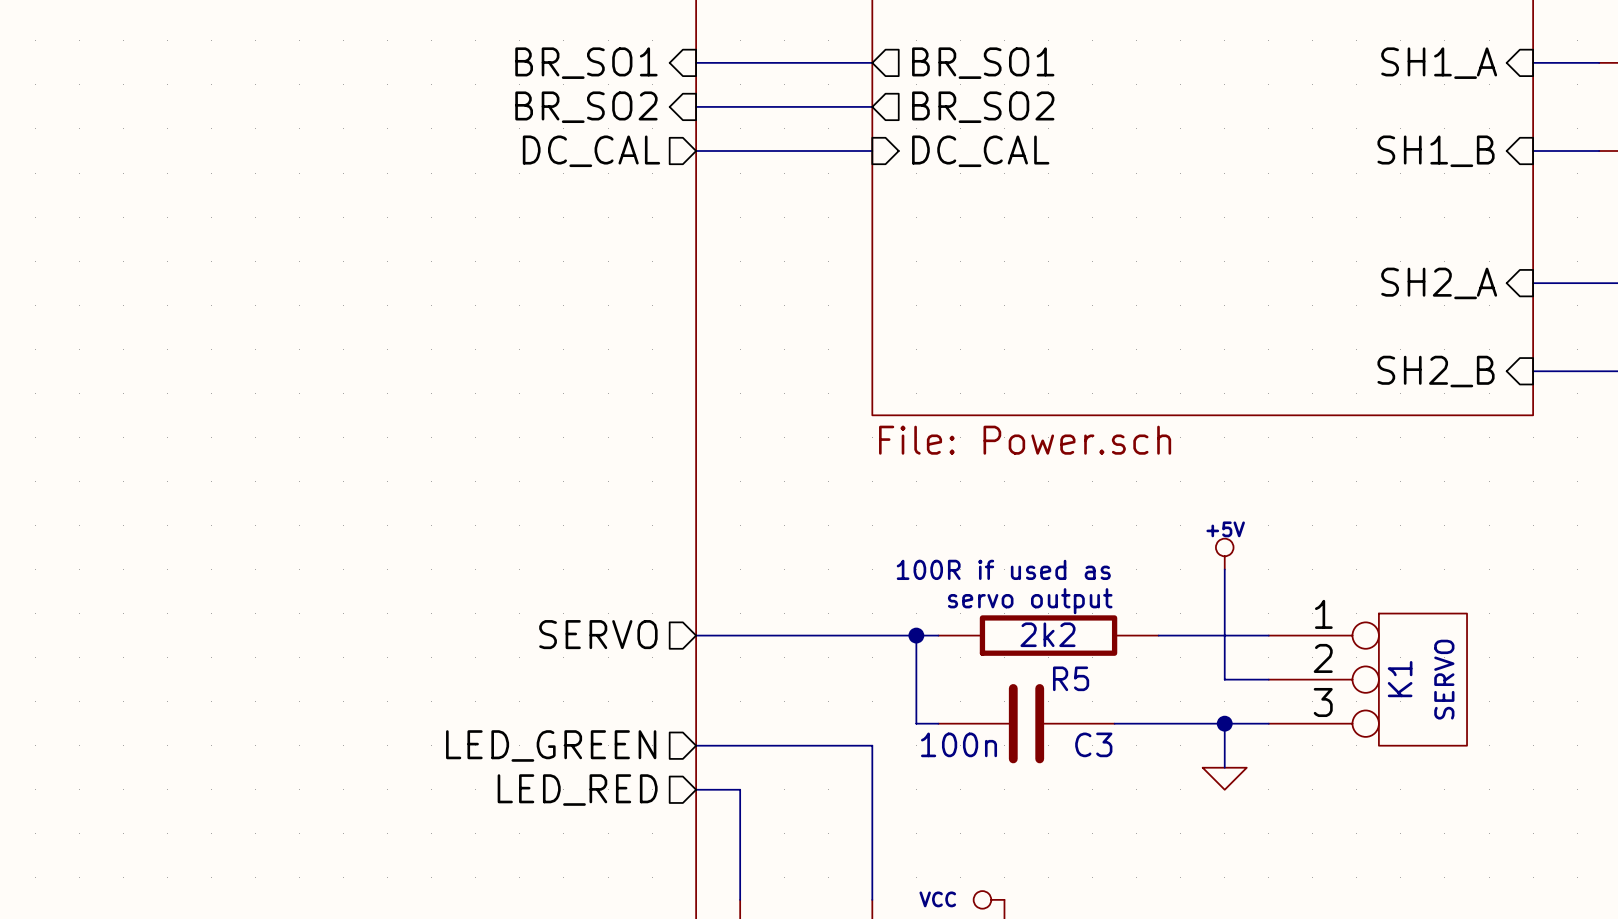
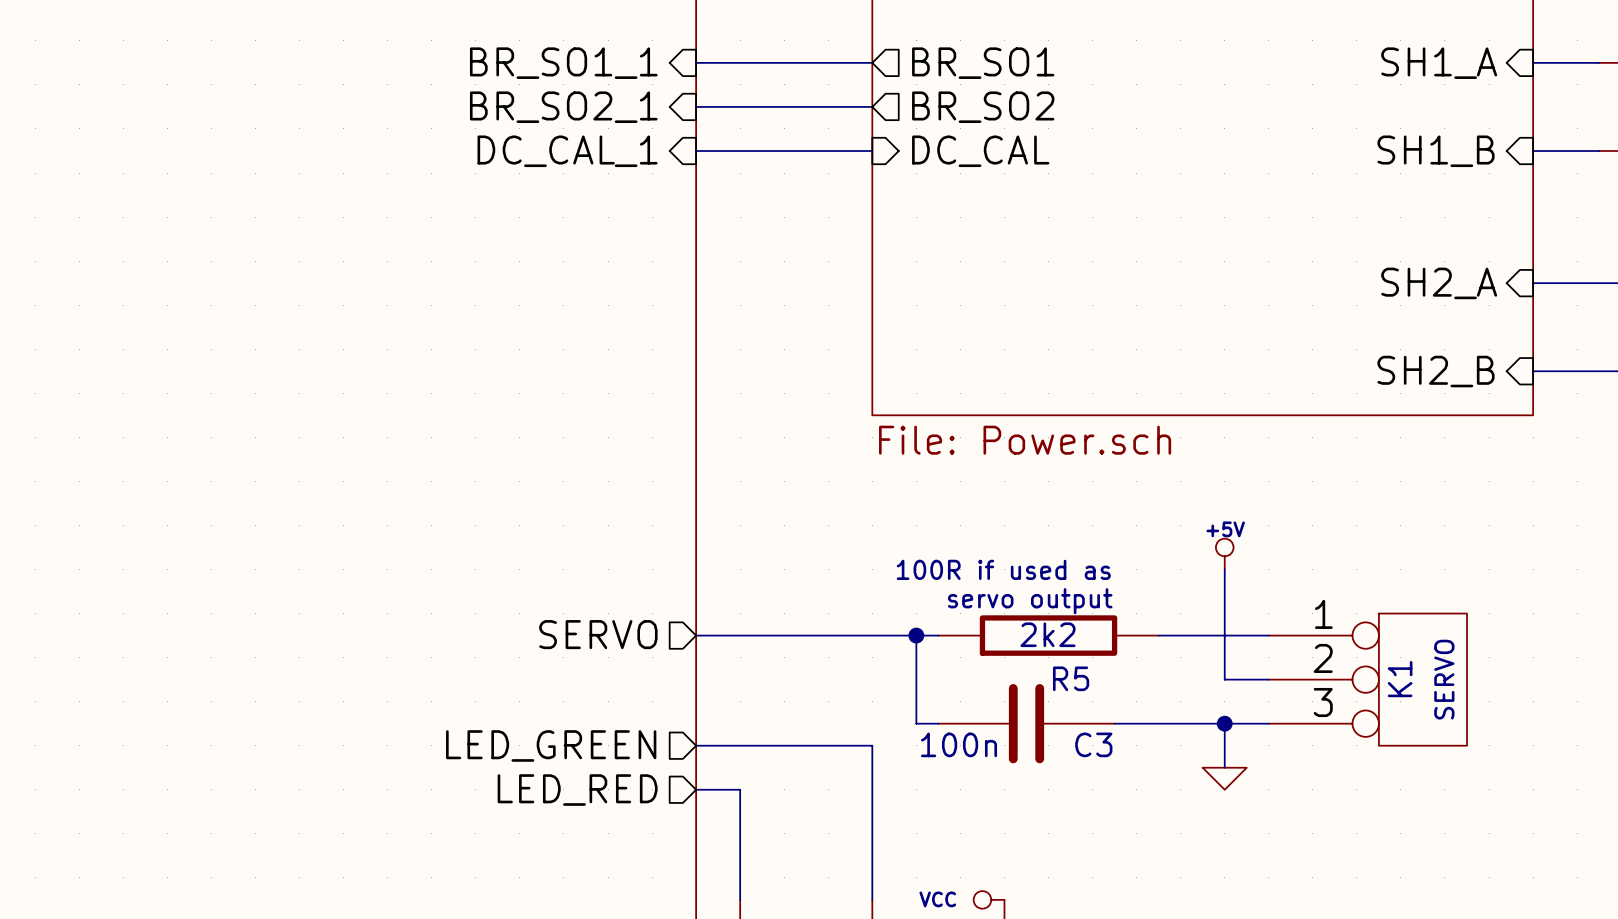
sheet pin: BR_SO1 (586, 63) -> BR_SO1_1 (563, 63)
sheet pin: BR_SO2 (586, 107) -> BR_SO2_1 (563, 107)
sheet pin shape: output (591, 151) -> input (567, 151)
sheet pin: DC_CAL (591, 151) -> DC_CAL_1 (567, 151)

